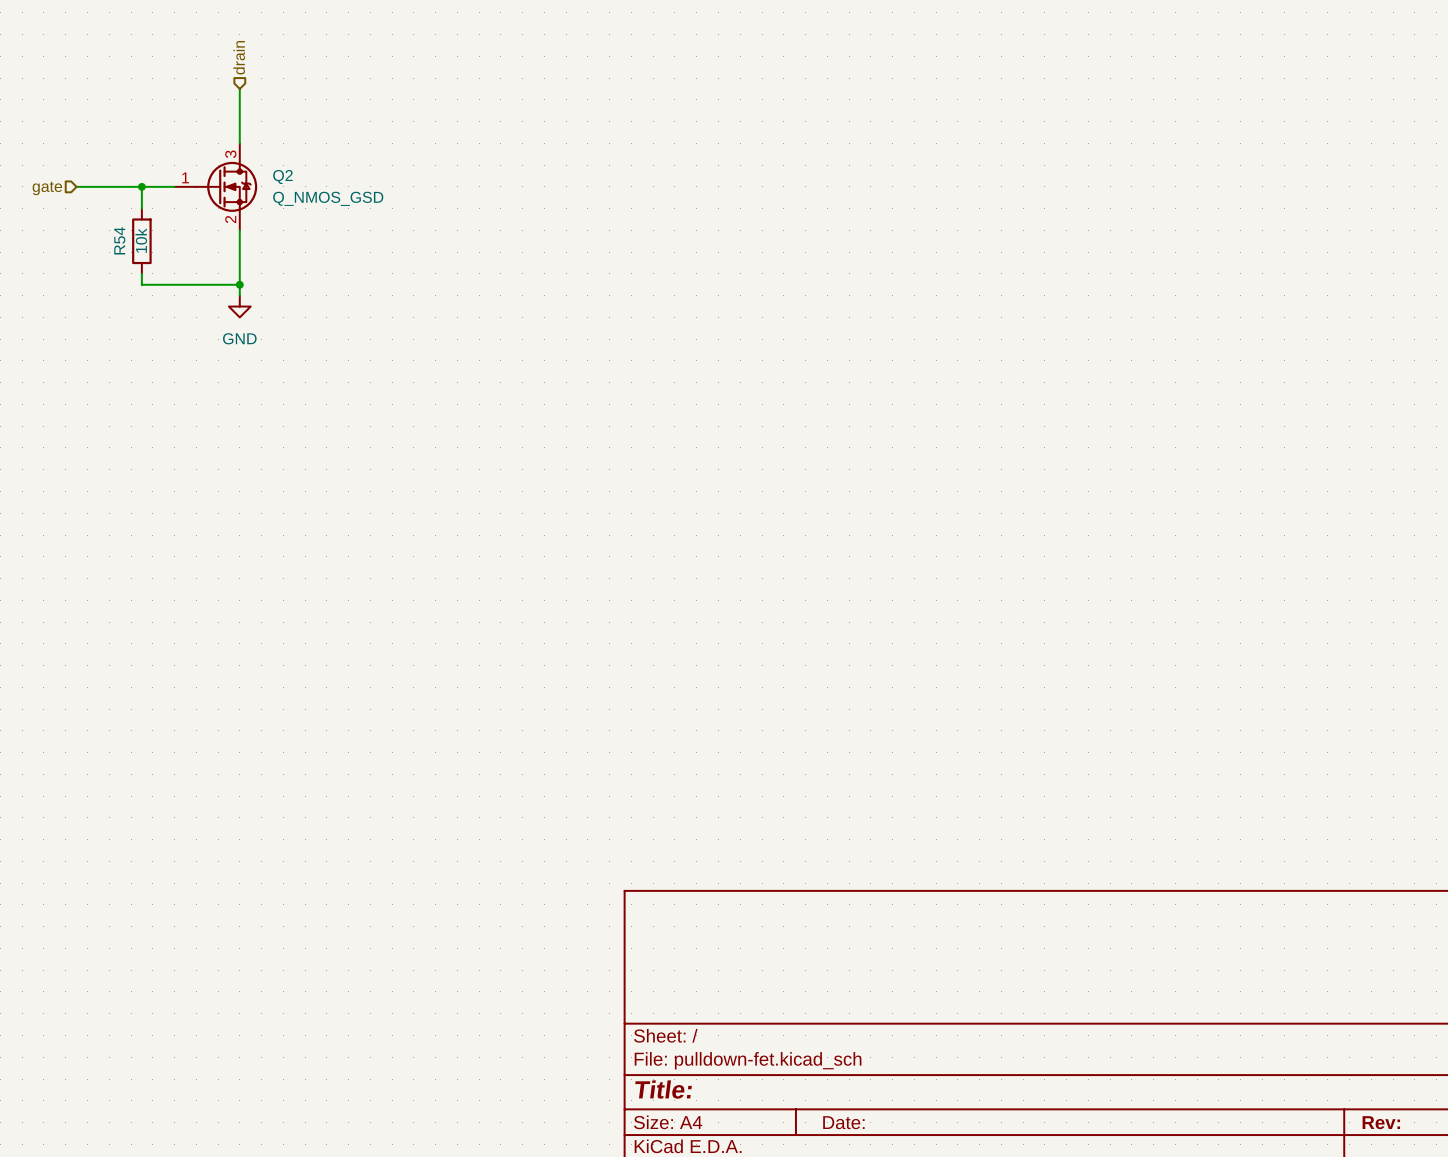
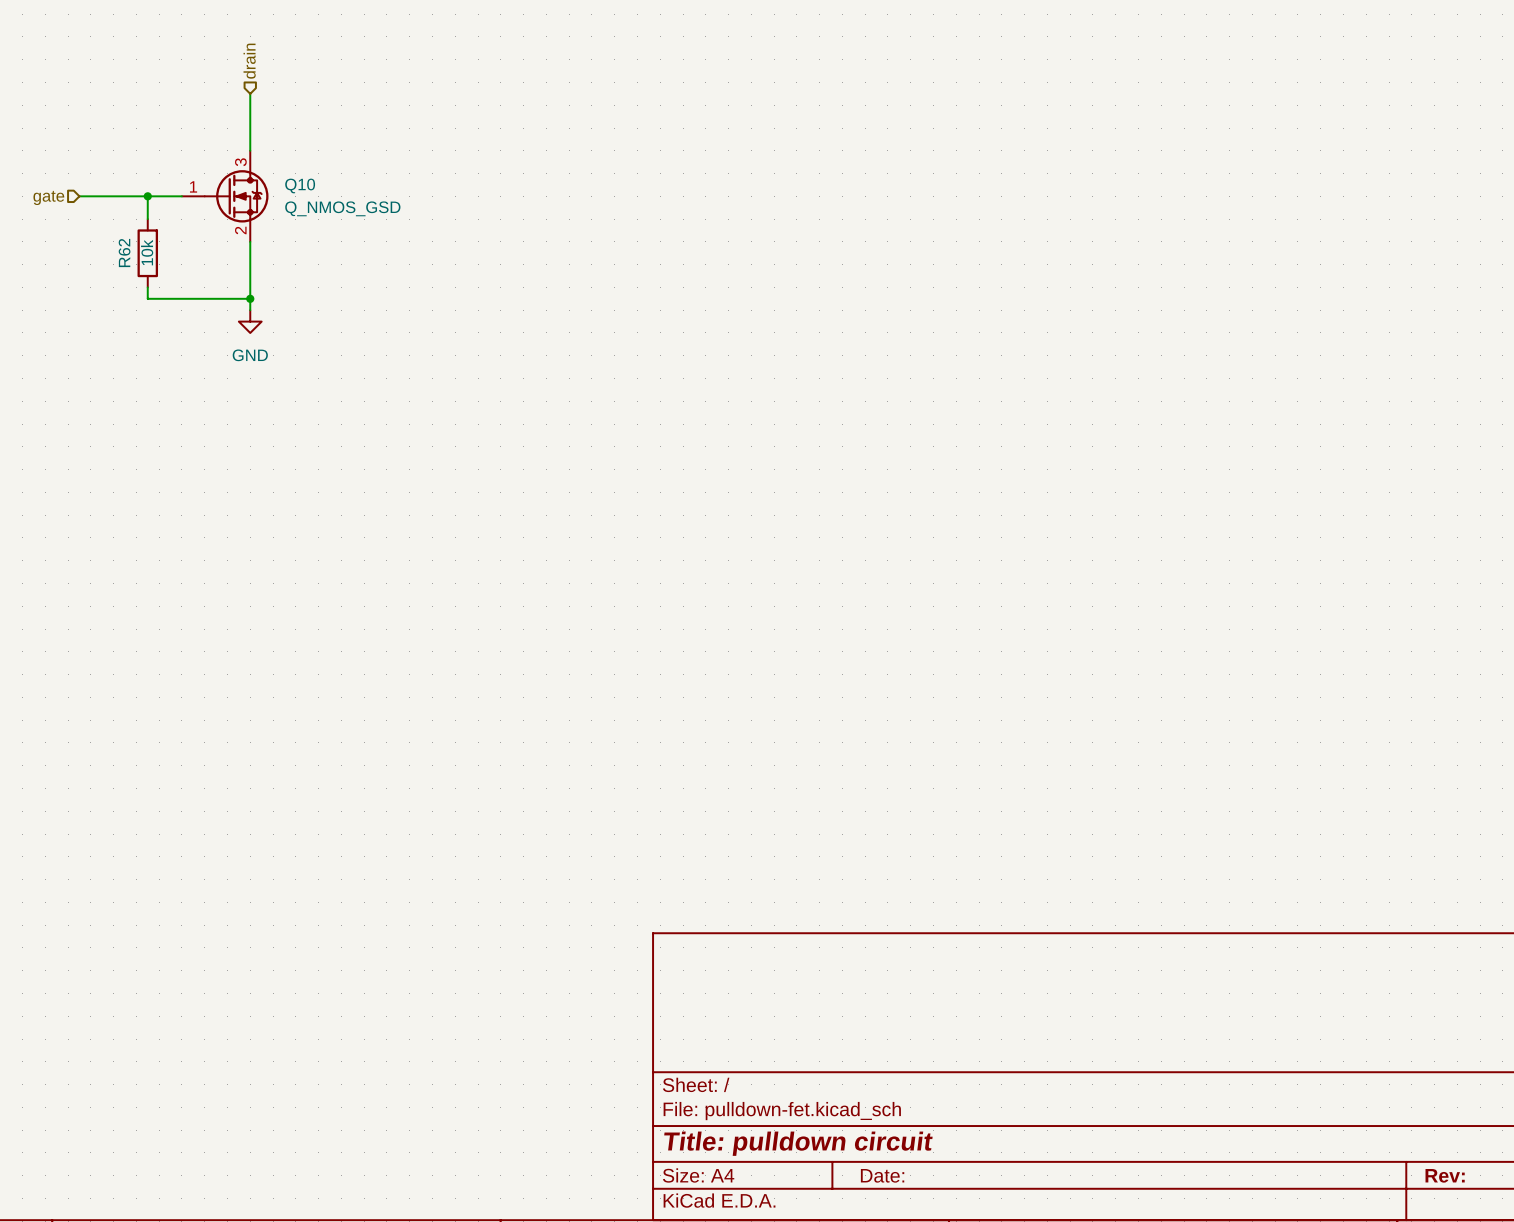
Q2 name: Q2 (282, 176) -> Q10 (300, 185)
R54 name: R54 (119, 240) -> R62 (124, 253)
title block: Title: (663, 1089) -> Title: pulldown circuit (798, 1143)

